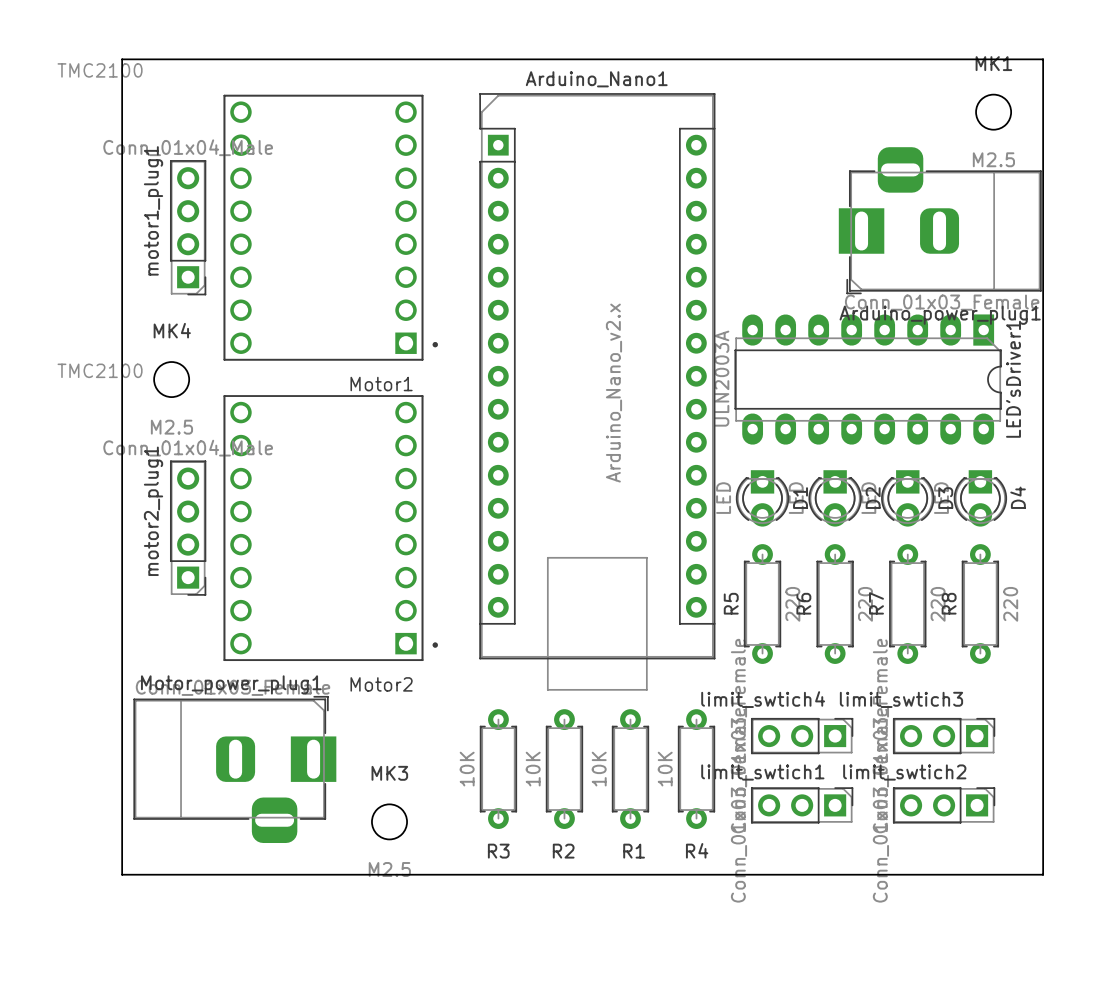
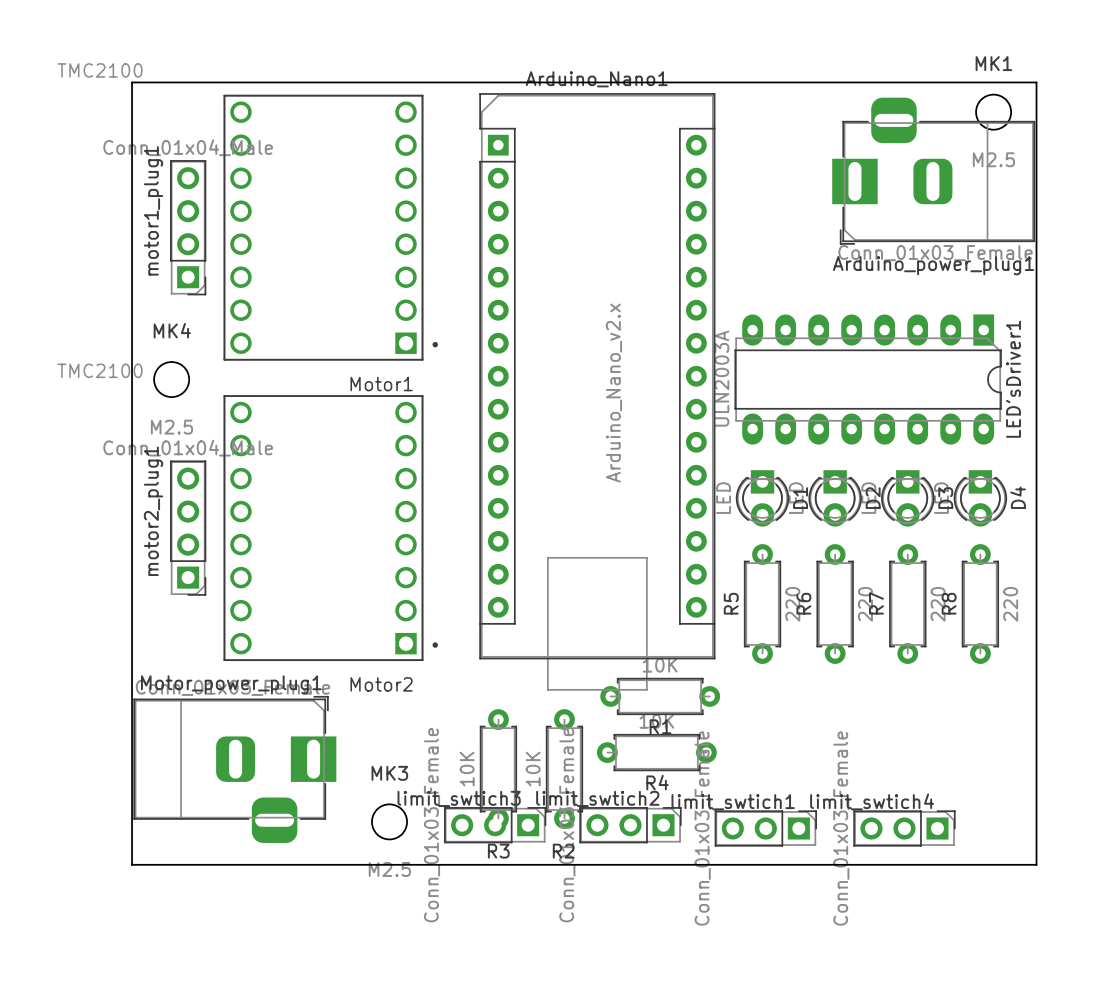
board edge: (122, 59) (1043, 59) (1043, 874) (122, 874) (122, 59) -> (132, 82) (132, 864) (1036, 864) (1036, 82) (132, 82)
Arduino_power_plug1 position: (940, 220) -> (933, 171)
limit_swtich4 name position: limit_swtich4 (763, 699) -> limit_swtich4 (872, 801)
limit_swtich3 name position: limit_swtich3 (901, 699) -> limit_swtich3 (459, 798)
limit_swtich4 position: (802, 736) -> (904, 828)
limit_swtich3 position: (944, 736) -> (495, 825)
R1 rotation: 0° (630, 769) -> 90° clockwise (660, 696)
R1 position: (630, 769) -> (660, 696)
R4 rotation: 0° (696, 769) -> 90° clockwise (656, 752)
limit_swtich1 name position: limit_swtich1 (762, 772) -> limit_swtich1 (733, 802)
limit_swtich2 name position: limit_swtich2 (904, 772) -> limit_swtich2 (597, 798)
limit_swtich1 position: (802, 805) -> (765, 828)
limit_swtich2 position: (944, 805) -> (630, 825)
R4 name position: R4 (697, 850) -> R4 (657, 782)
R1 name position: R1 (634, 851) -> R1 (660, 726)

